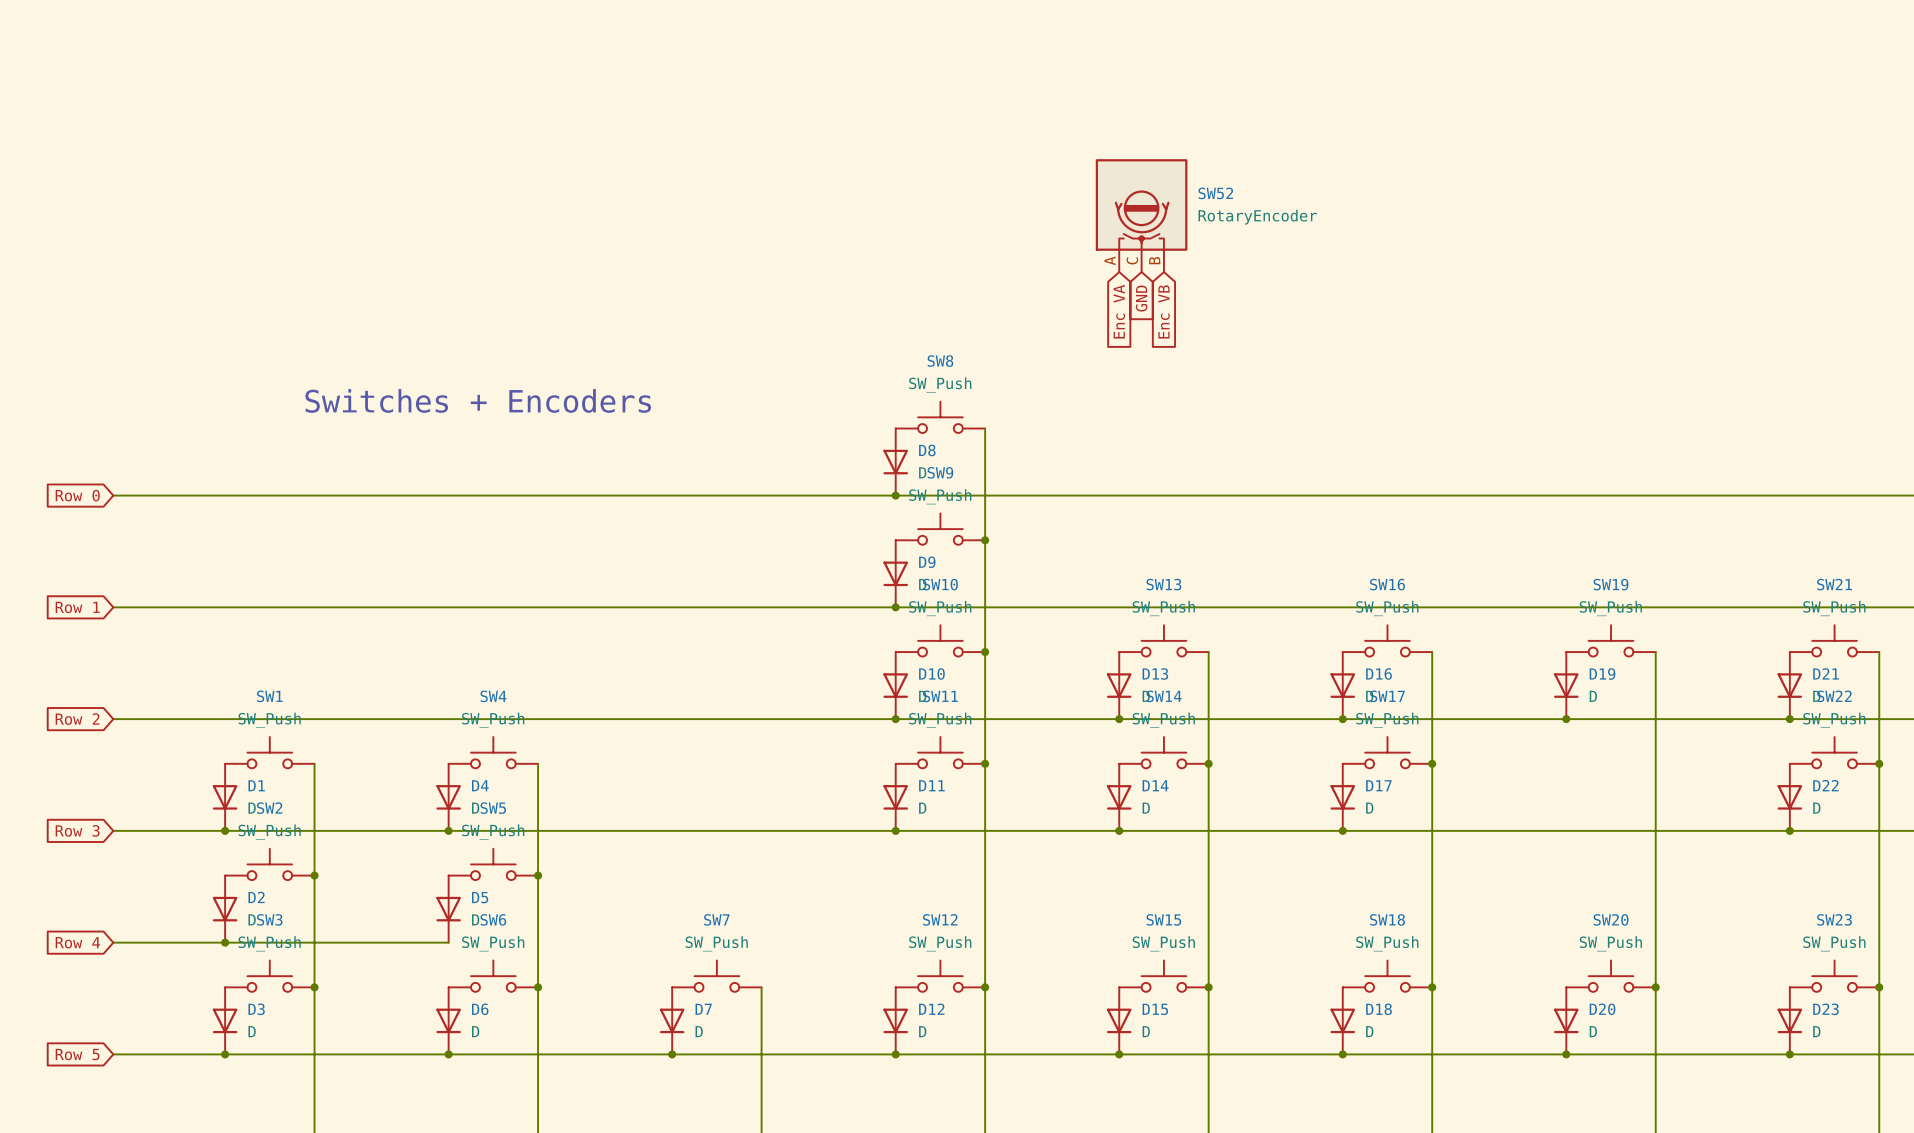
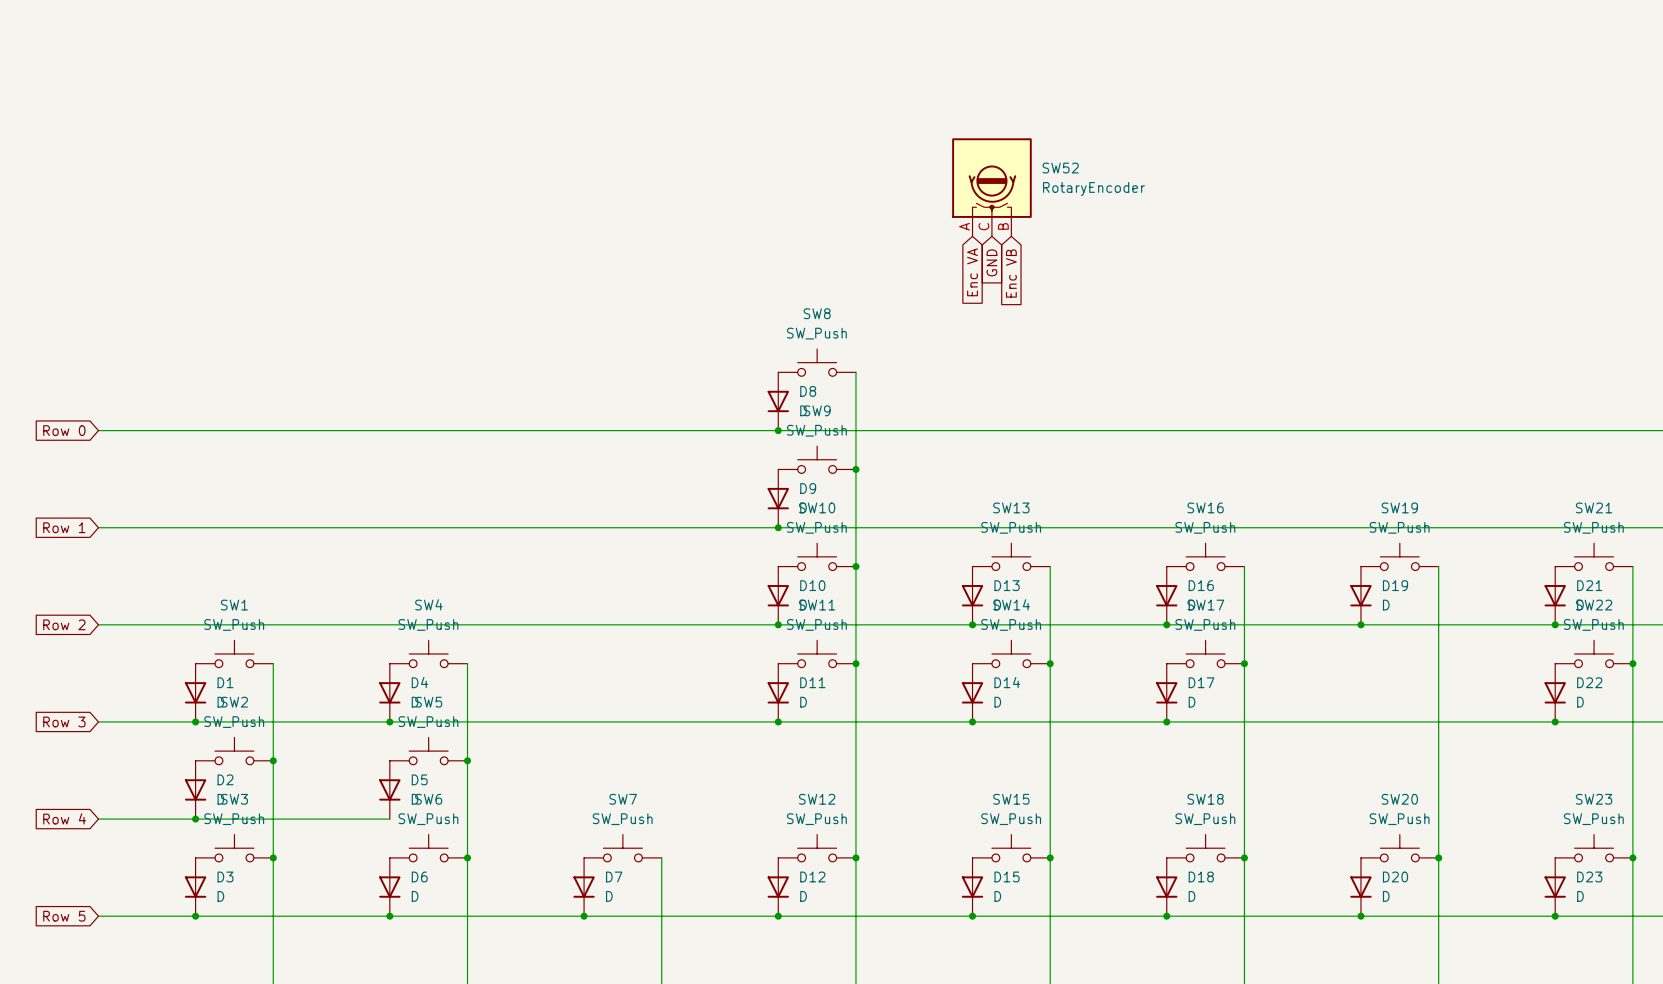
text: Switches + Encoders (478, 400) -> none

